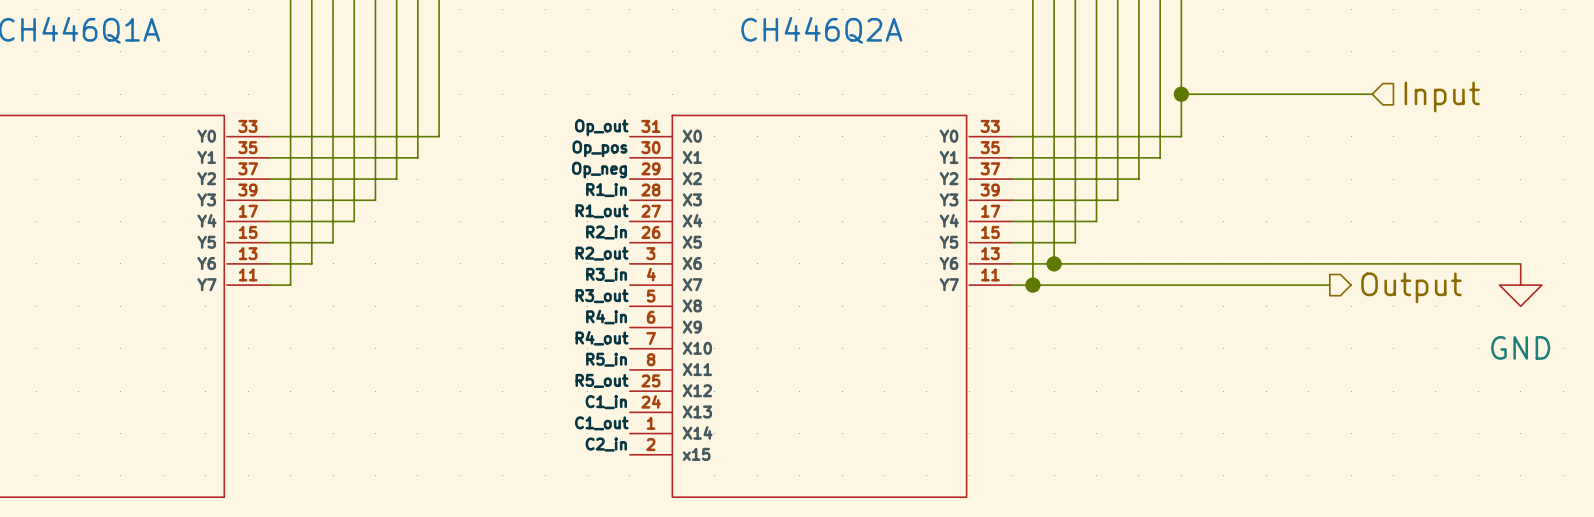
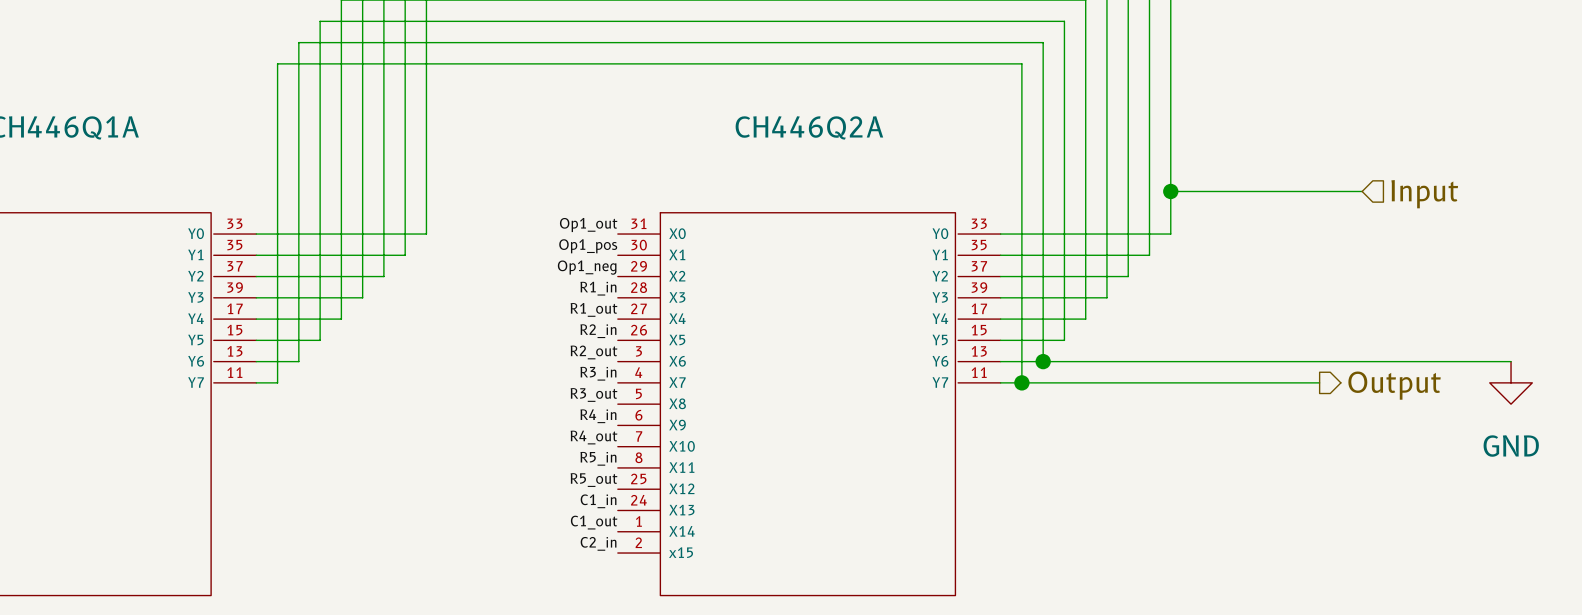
label: Op_out (601, 127) -> Op1_out (588, 225)
label: Op_pos (599, 148) -> Op1_pos (588, 246)
label: Op_neg (599, 170) -> Op1_neg (587, 267)

